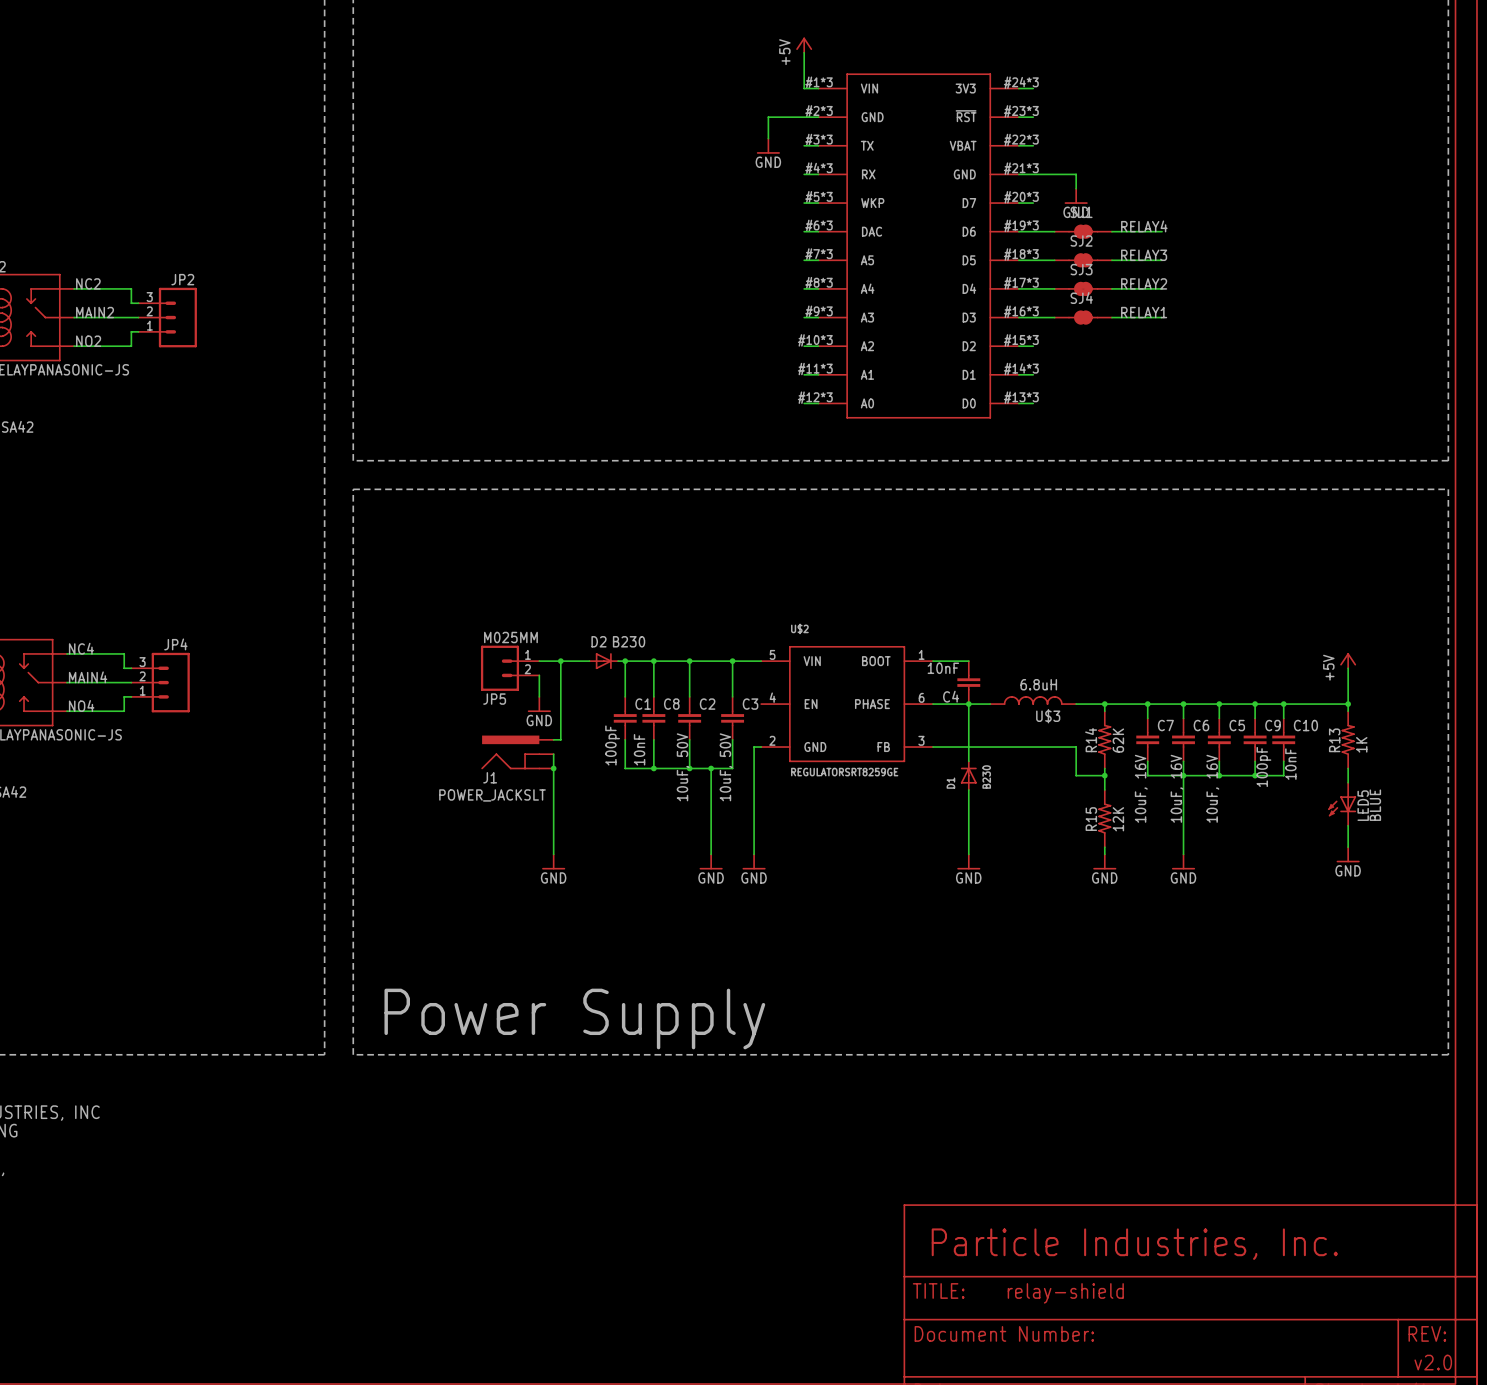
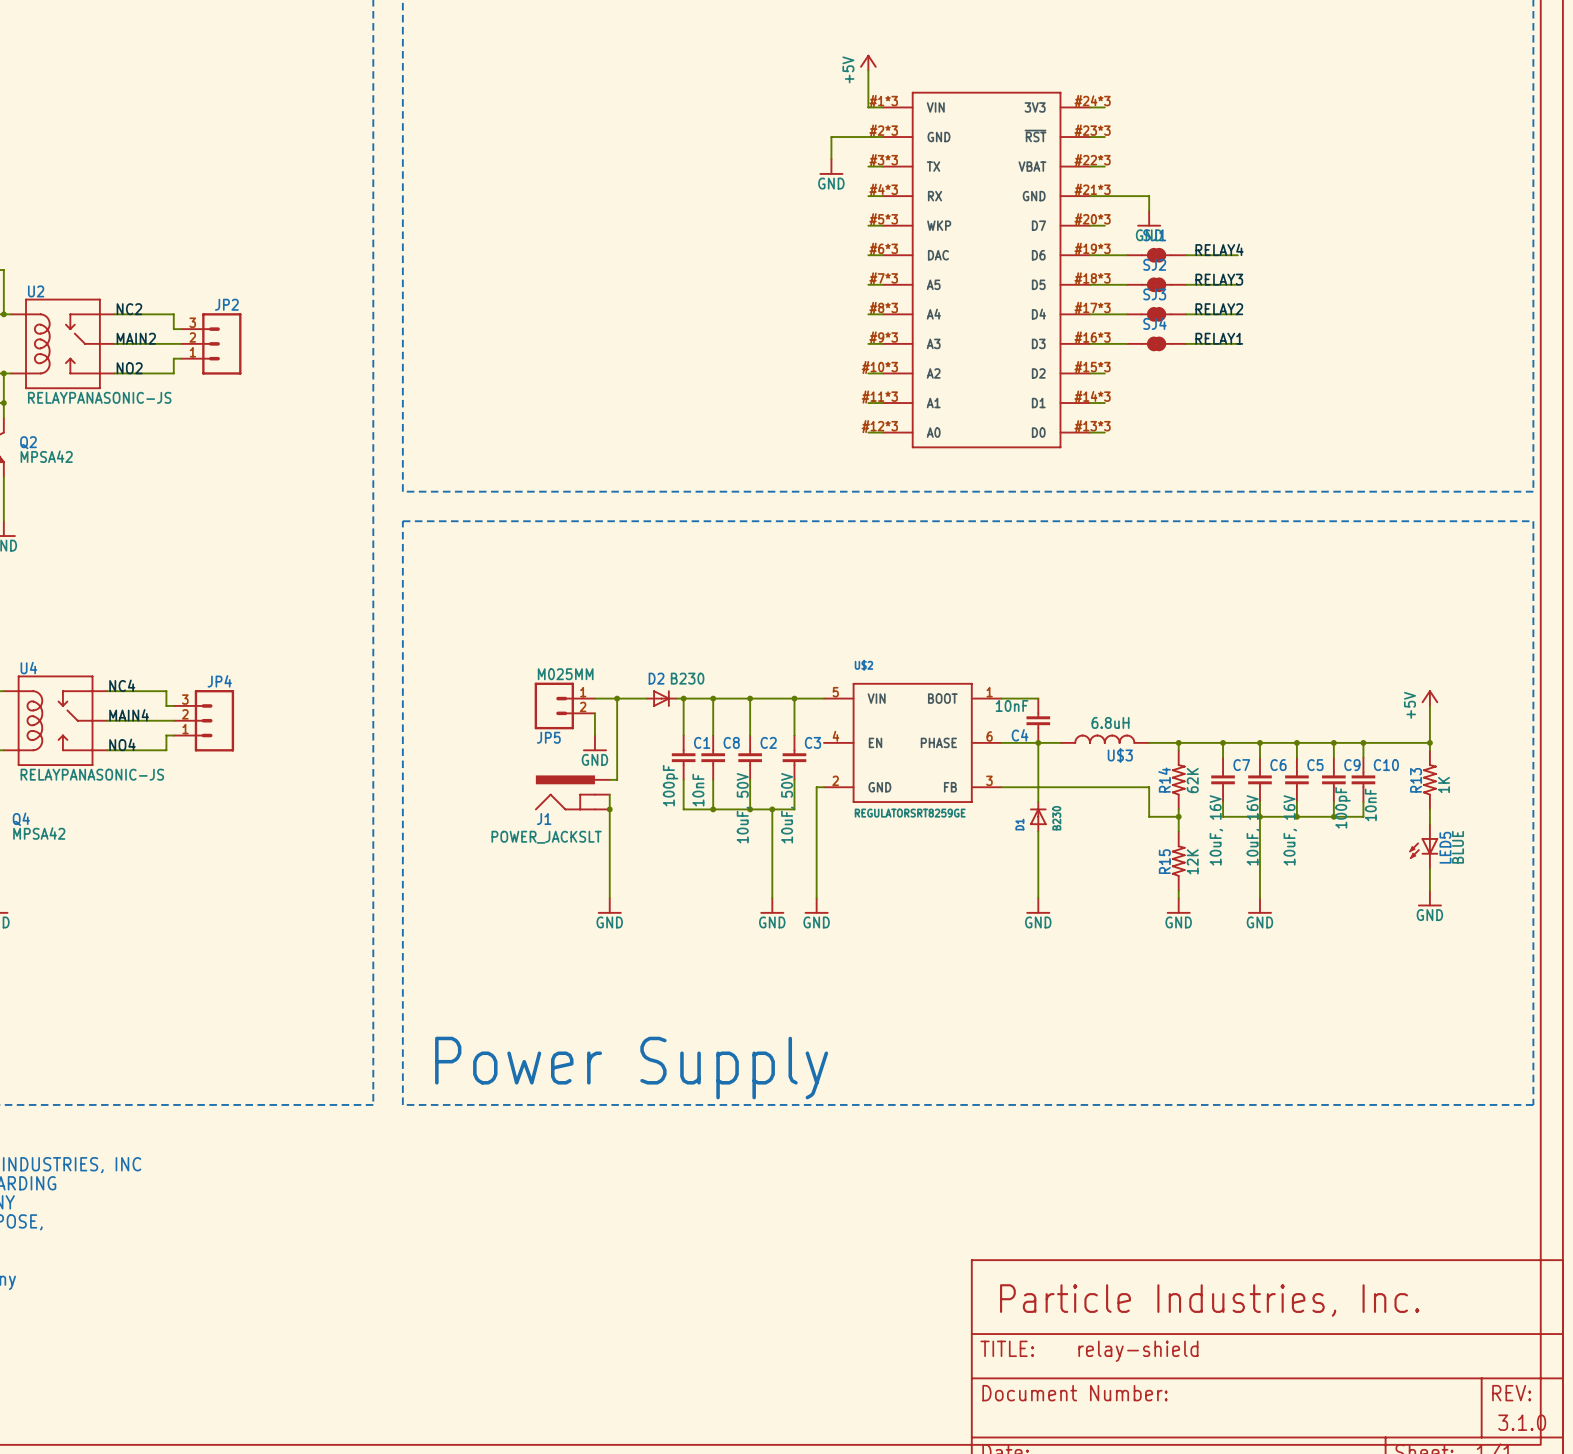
text: v2.0 (1433, 1362) -> 3.1.0 (1522, 1422)

